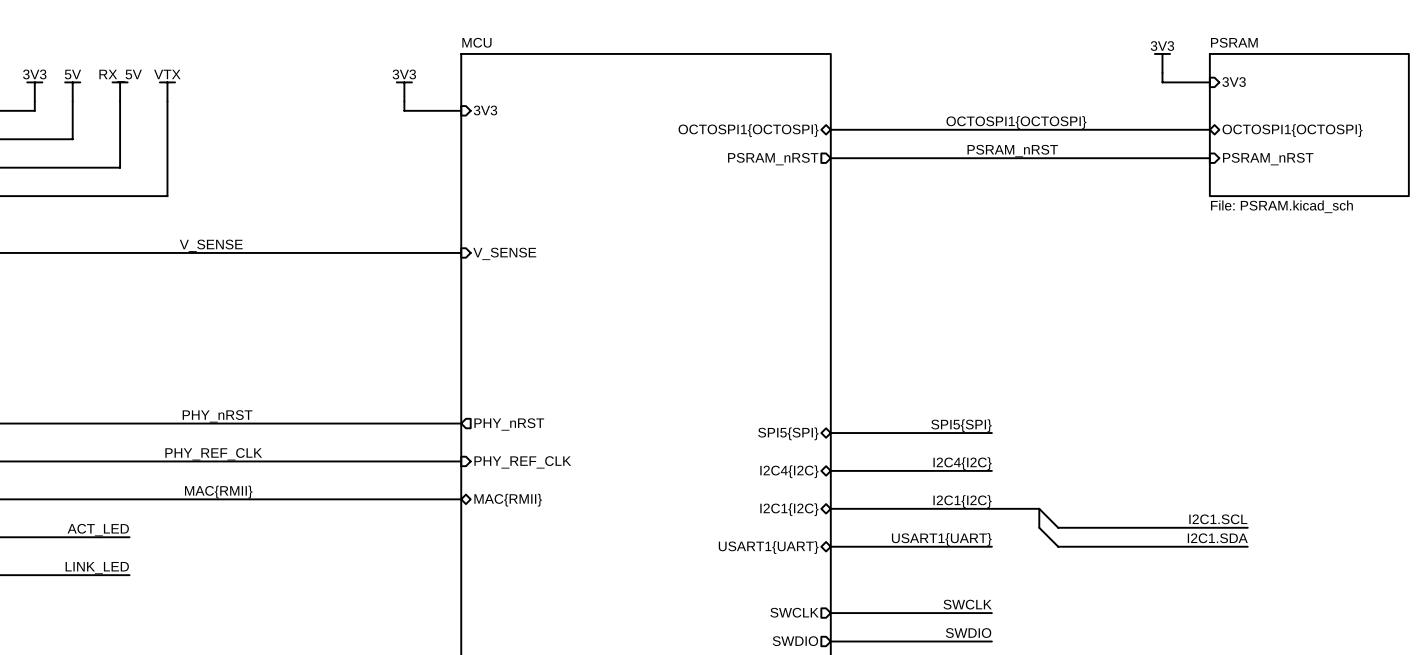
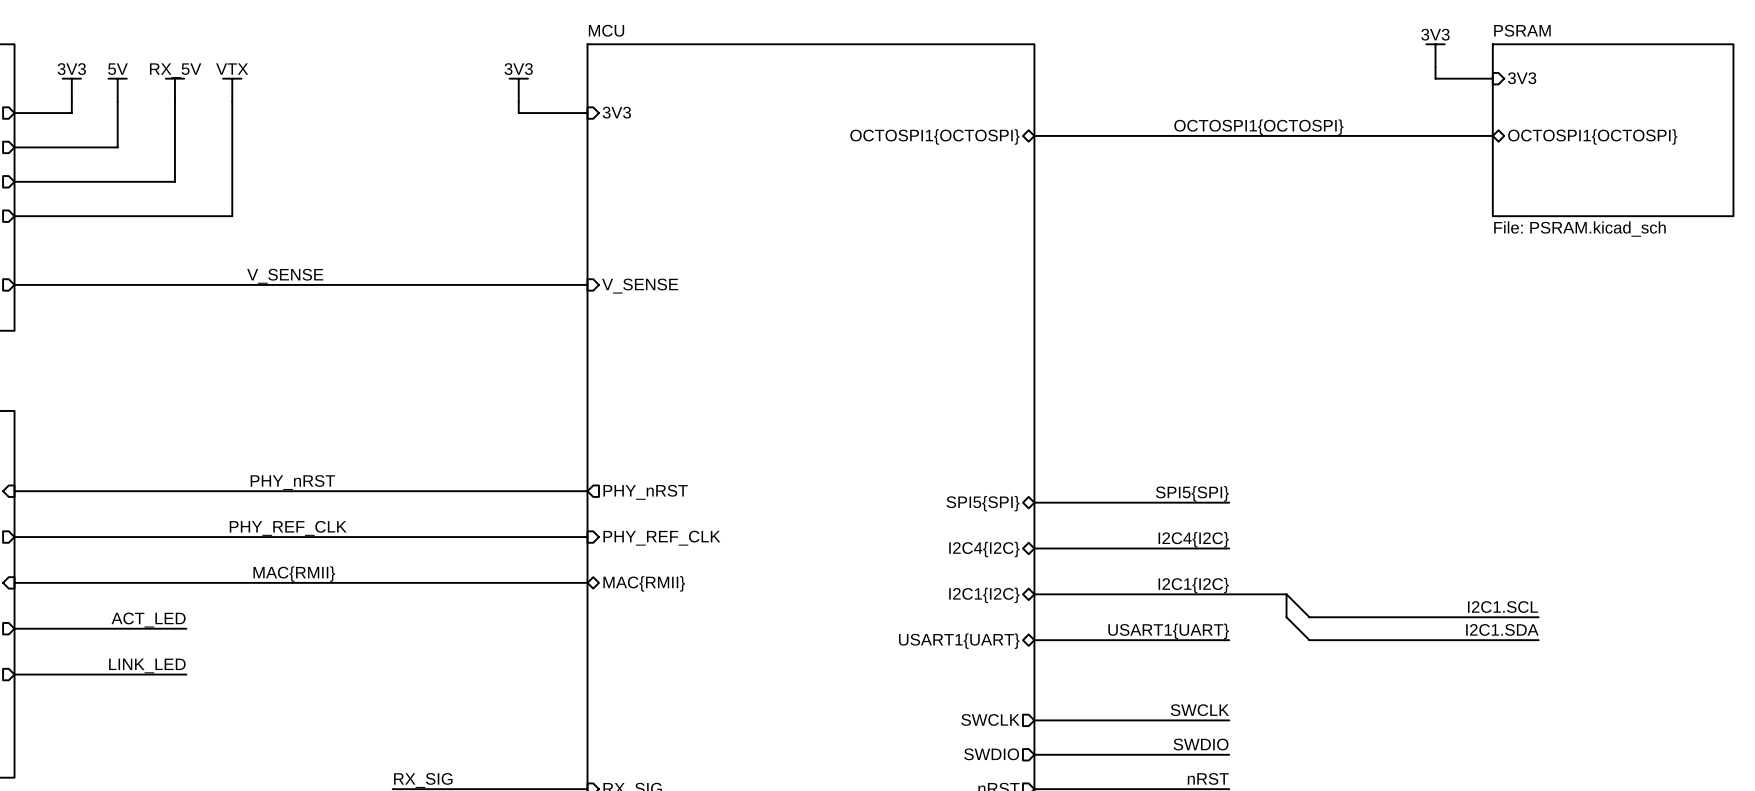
label: PSRAM_nRST (1012, 151) -> none
wire: (830, 158) (1209, 158) -> none
sheet pin: PSRAM_nRST (773, 159) -> none
sheet pin: PSRAM_nRST (1268, 159) -> none

